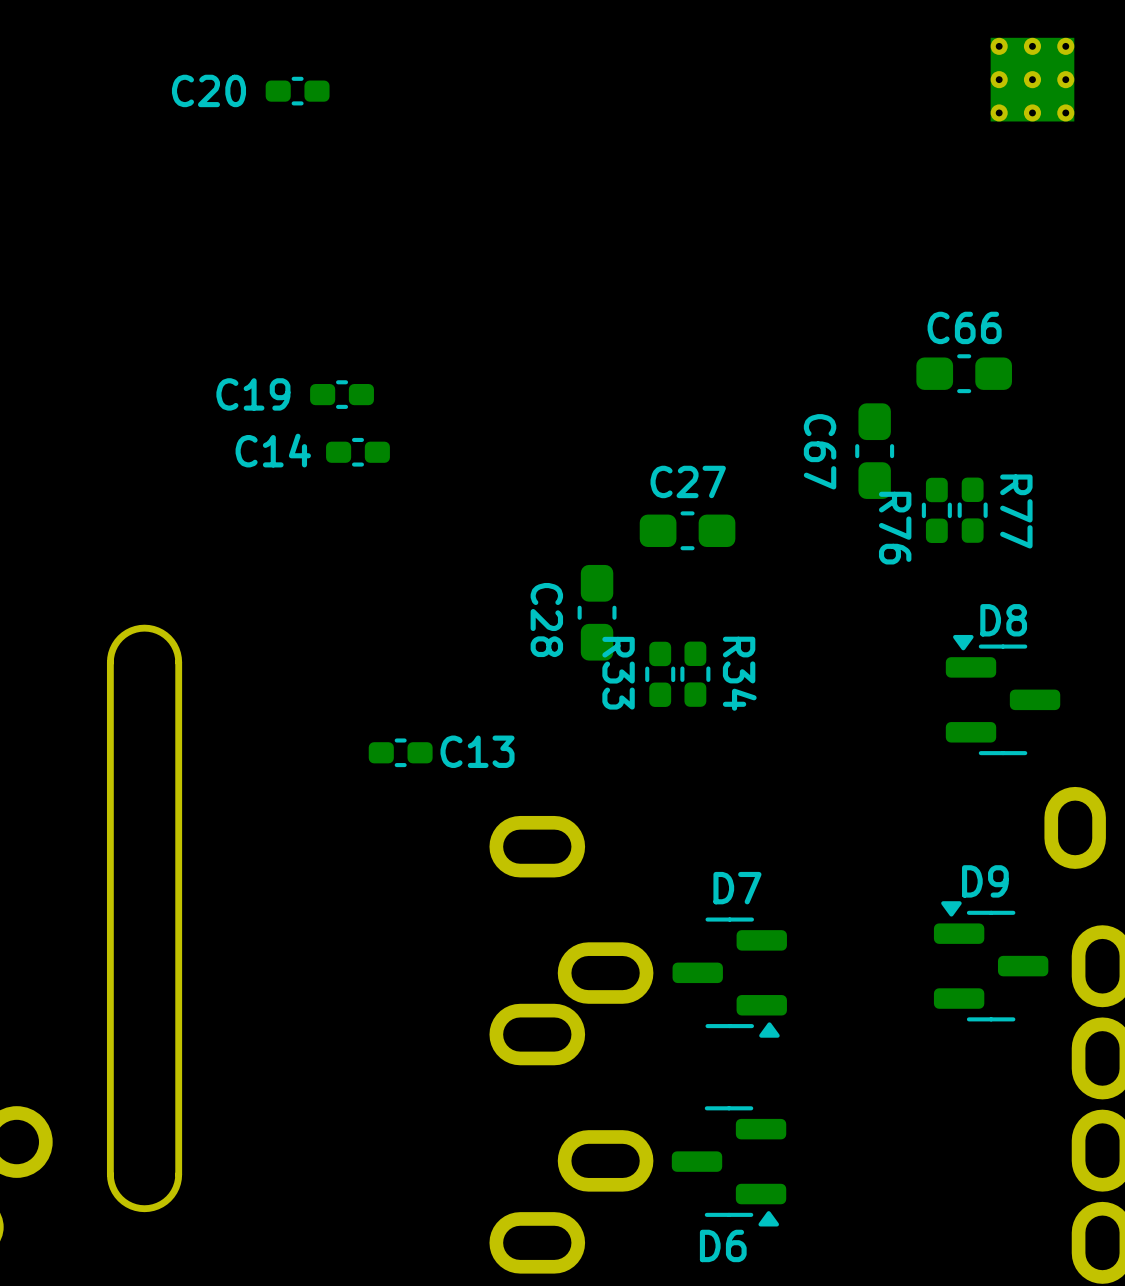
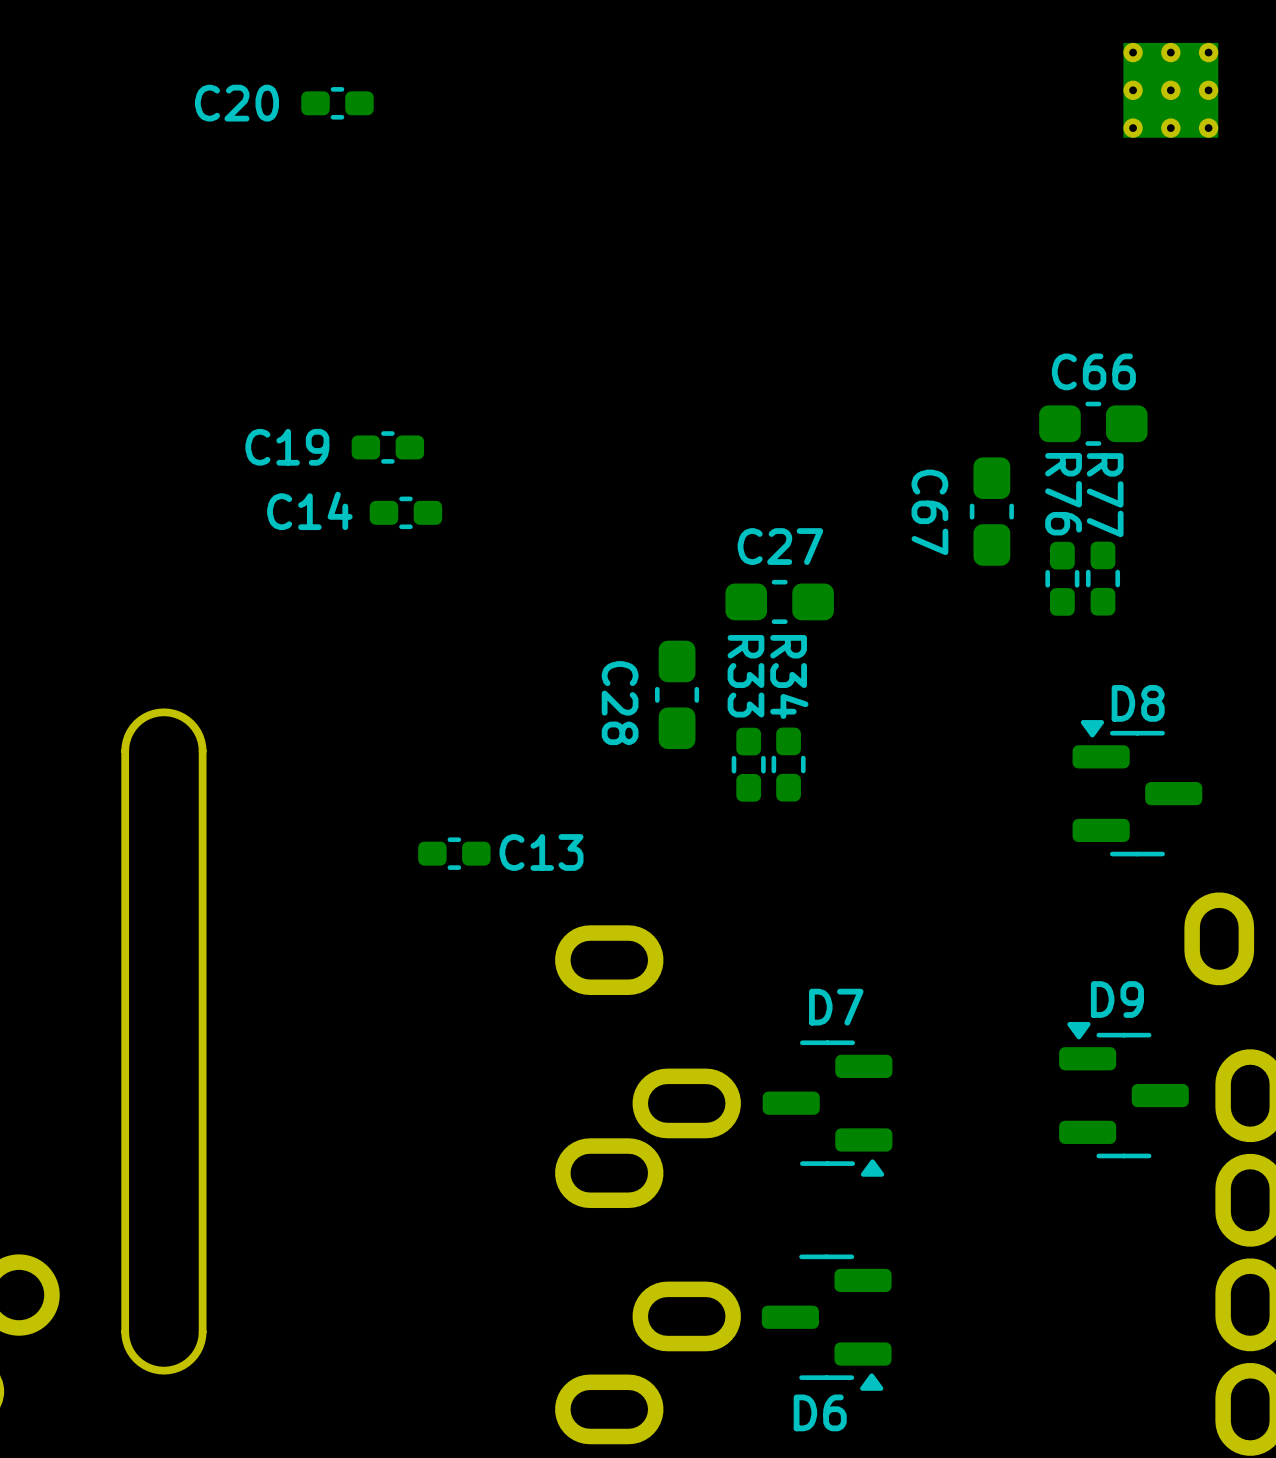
R77 name position: R77 (1016, 511) -> R77 (1105, 495)
R76 name position: R76 (895, 528) -> R76 (1063, 494)
R33 name position: R33 (618, 673) -> R33 (745, 676)
R34 name position: R34 (739, 673) -> R34 (789, 676)

